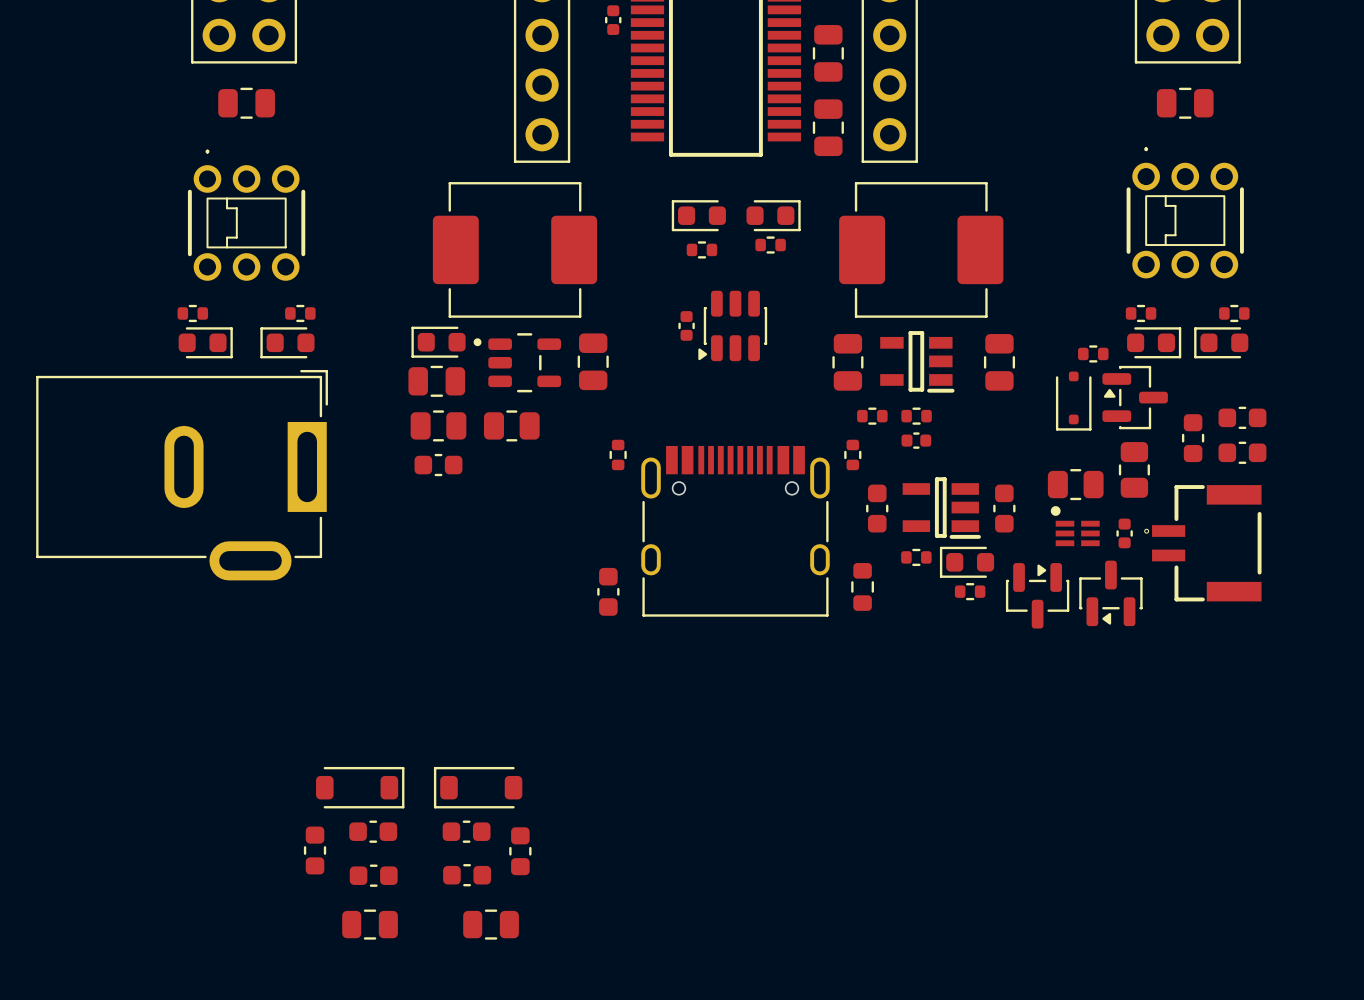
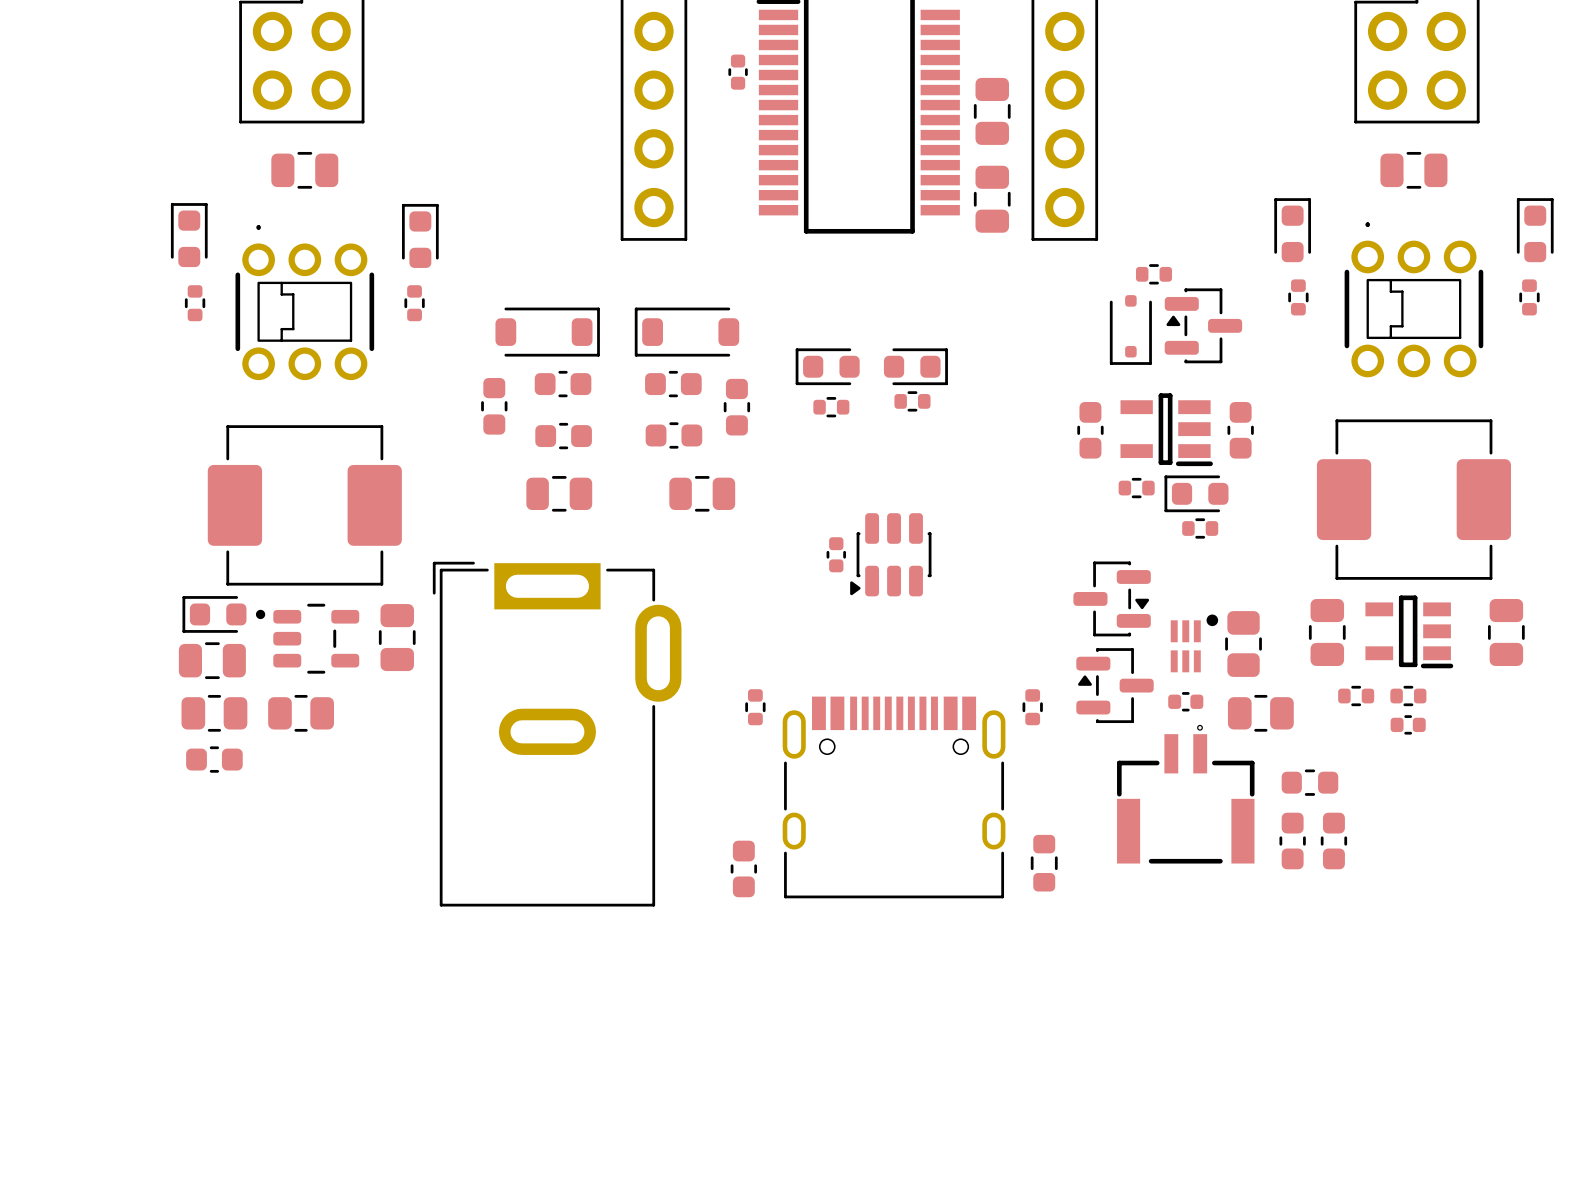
part: none -> (1292, 230)
part: none -> (1535, 230)
part: none -> (189, 235)
part: none -> (420, 235)
part: none -> (1153, 274)
part: none -> (1298, 297)
part: none -> (1529, 297)
part: none -> (195, 303)
part: none -> (414, 303)
part: (698, 215) -> none
part: (773, 215) -> none
part: none -> (1203, 325)
part: none -> (547, 332)
part: none -> (687, 332)
part: (770, 245) -> none
part position: (514, 249) -> (304, 505)
part: (701, 249) -> none
part position: (921, 249) -> (1413, 499)
part: none -> (827, 366)
part: none -> (915, 366)
part: none -> (563, 384)
part: none -> (673, 384)
part: none -> (912, 401)
part: none -> (494, 406)
part: none -> (736, 407)
part: none -> (831, 407)
part: (192, 313) -> none
part: (300, 313) -> none
part: (1141, 313) -> none
part: (1234, 313) -> none
part: none -> (1090, 430)
part: none -> (1240, 430)
part position: (686, 325) -> (836, 554)
part position: (732, 325) -> (890, 554)
part: none -> (673, 435)
part: none -> (563, 436)
part footprint: [577, 333, 609, 391] -> [669, 476, 736, 512]
part footprint: [983, 334, 1016, 391] -> [1164, 475, 1229, 513]
part: (205, 342) -> none
part: (287, 342) -> none
part: (438, 342) -> none
part: (1154, 342) -> none
part: (1221, 342) -> none
part: (1093, 353) -> none
part position: (917, 361) -> (1409, 631)
part position: (517, 362) -> (307, 638)
part: (847, 362) -> none
part footprint: [36, 369, 328, 581] -> [182, 596, 247, 633]
part: none -> (1136, 488)
part: none -> (559, 493)
part: (436, 381) -> none
part: (1135, 397) -> none
part position: (1073, 401) -> (1130, 330)
part: none -> (1200, 528)
part: (872, 416) -> none
part: (916, 416) -> none
part: (1242, 417) -> none
part: (438, 425) -> none
part: (511, 425) -> none
part rotation: 0° (1193, 438) -> 90° clockwise (1309, 782)
part position: (1193, 438) -> (1309, 782)
part: (916, 440) -> none
part: (1242, 452) -> none
part: (618, 454) -> none
part: (852, 454) -> none
part: (438, 465) -> none
part: none -> (1112, 598)
part: (1134, 469) -> none
part footprint: [993, 484, 1016, 533] -> [1170, 614, 1219, 673]
part rotation: 0° (1075, 484) -> 90° clockwise (1243, 644)
part position: (1075, 484) -> (1243, 644)
part: none -> (1327, 632)
part: none -> (1506, 632)
part: none -> (397, 637)
part: (877, 508) -> none
part position: (941, 508) -> (1166, 429)
part: none -> (212, 660)
part footprint: [1116, 518, 1133, 549] -> [1338, 685, 1375, 707]
part: (1075, 526) -> none
part position: (735, 531) -> (894, 797)
part: none -> (1115, 685)
part rotation: 0° (1202, 543) -> 90° clockwise (1185, 794)
part position: (1202, 543) -> (1185, 794)
part: none -> (1408, 696)
part: none -> (1185, 701)
part: none -> (755, 707)
part: none -> (1032, 707)
part: (916, 557) -> none
part: none -> (214, 713)
part: none -> (301, 713)
part: (967, 562) -> none
part: none -> (1260, 713)
part: none -> (1408, 724)
part: none -> (557, 734)
part position: (862, 586) -> (1044, 863)
part: (608, 591) -> none
part: (970, 591) -> none
part: (1110, 593) -> none
part: (1037, 595) -> none
part: none -> (214, 759)
part: none -> (1292, 841)
part: none -> (1333, 841)
part: none -> (743, 868)
part: (360, 787) -> none
part: (478, 787) -> none
part: (373, 831) -> none
part: (466, 831) -> none
part: (315, 850) -> none
part: (520, 851) -> none
part: (373, 875) -> none
part: (467, 875) -> none
part: (370, 924) -> none
part: (491, 924) -> none

